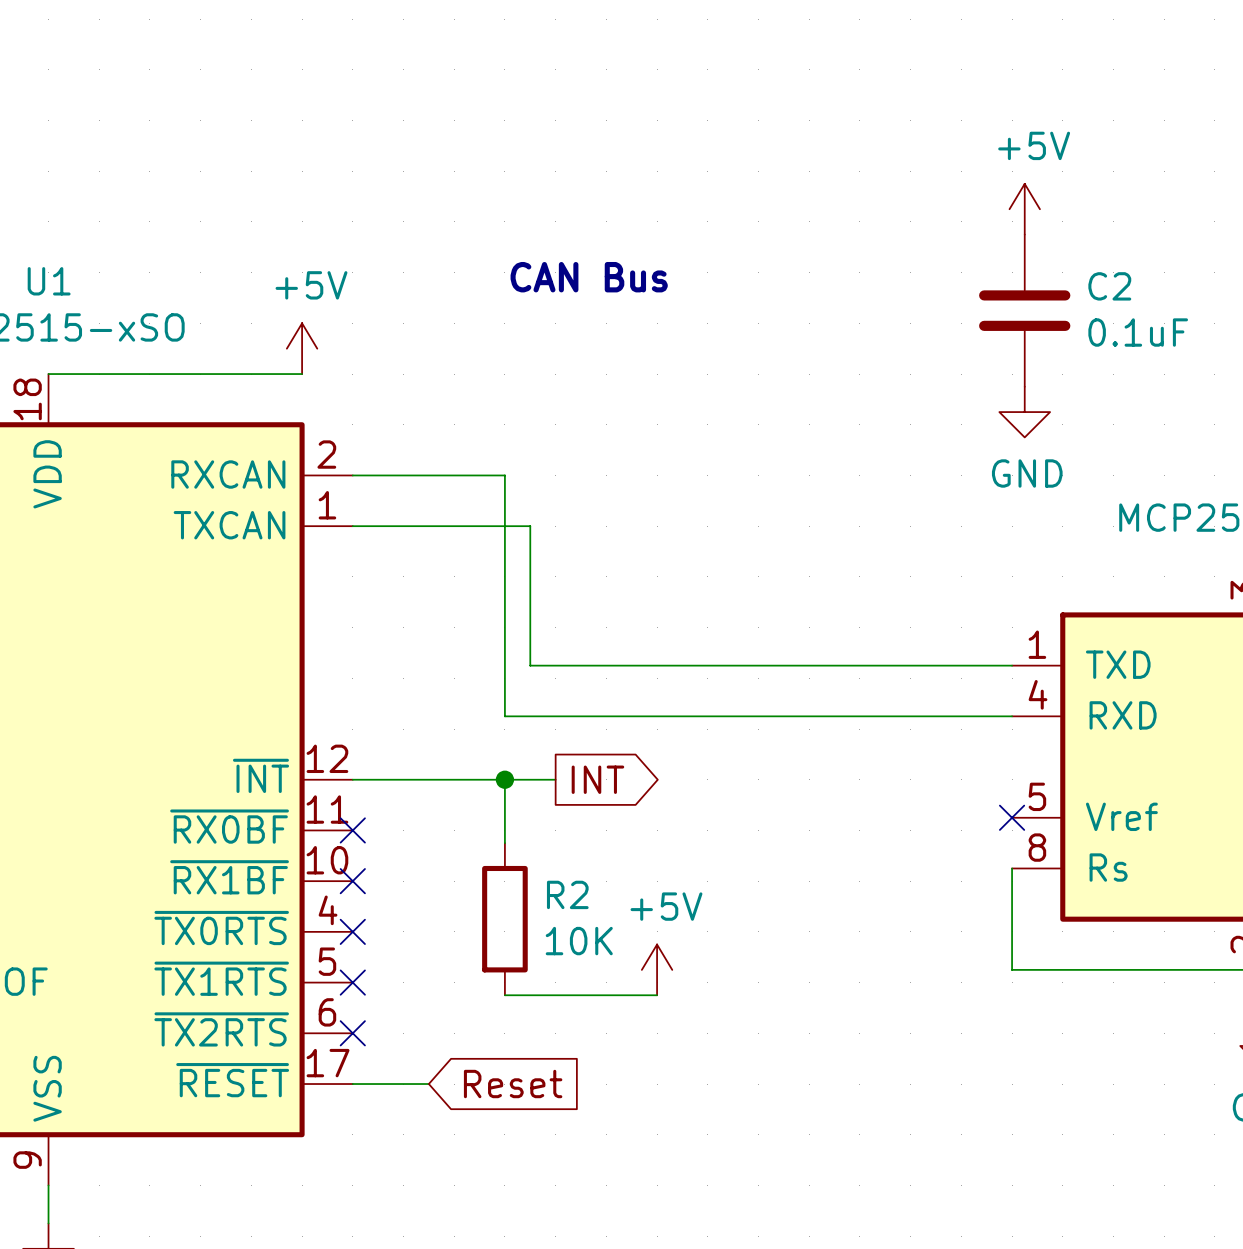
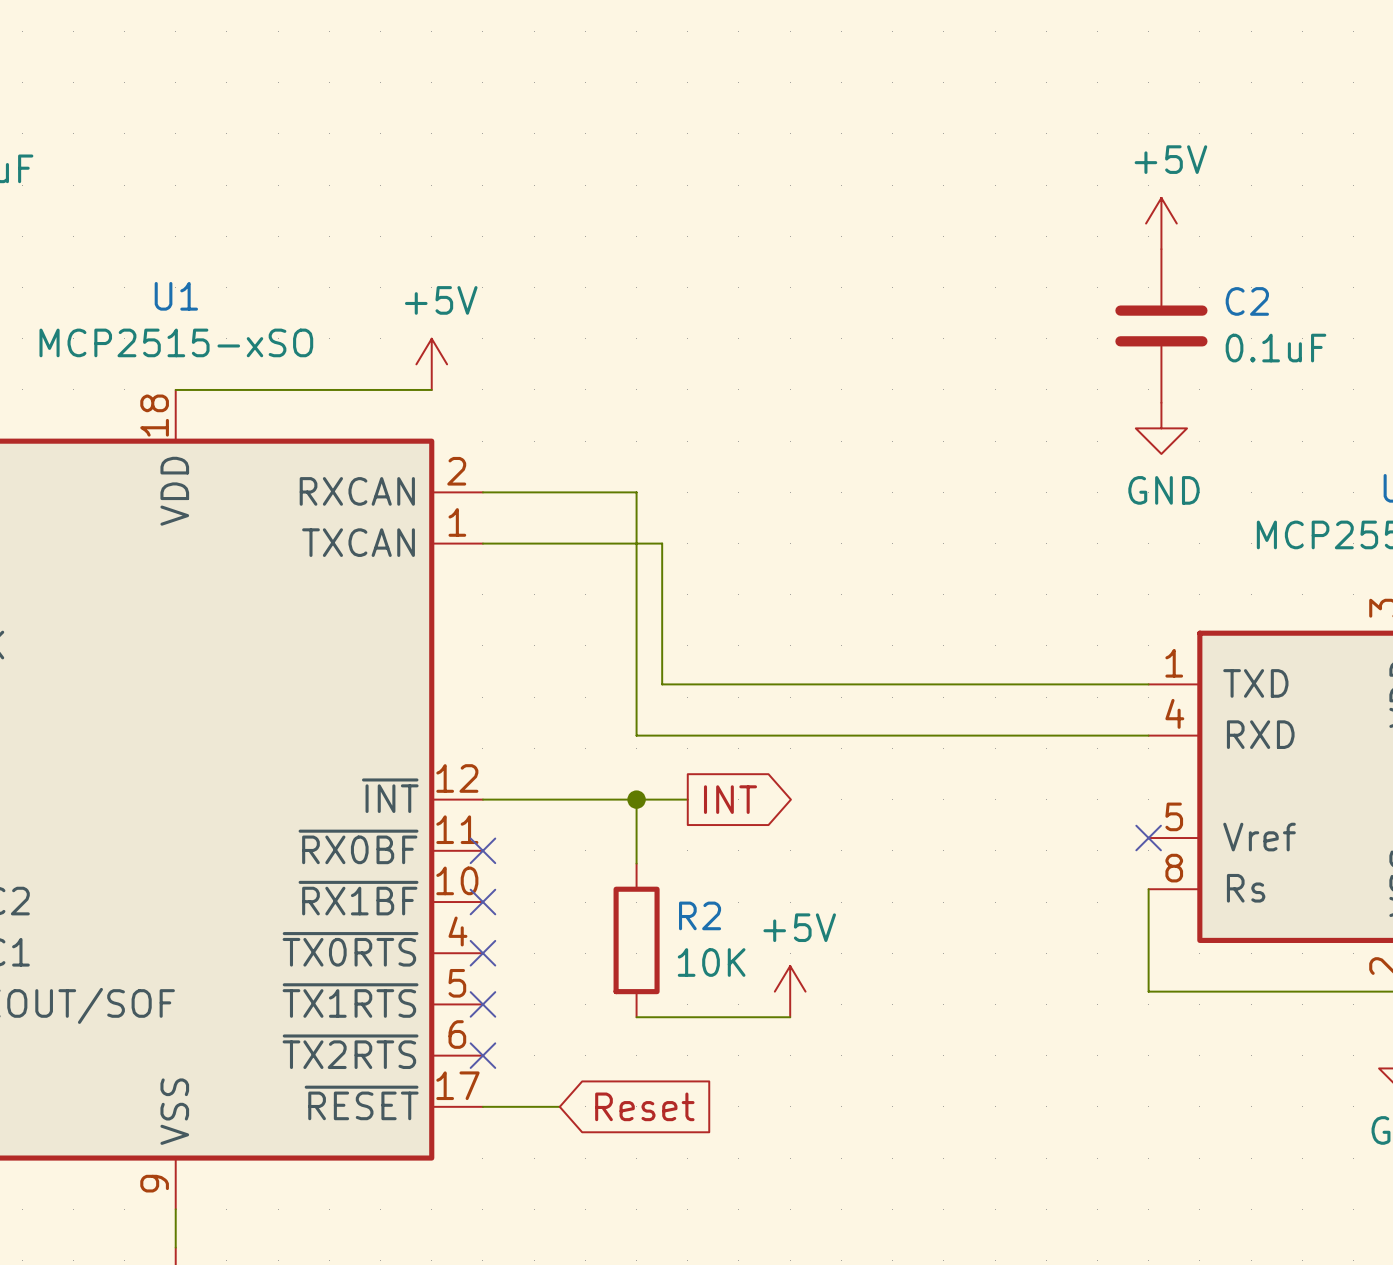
text: CAN Bus (589, 277) -> none

